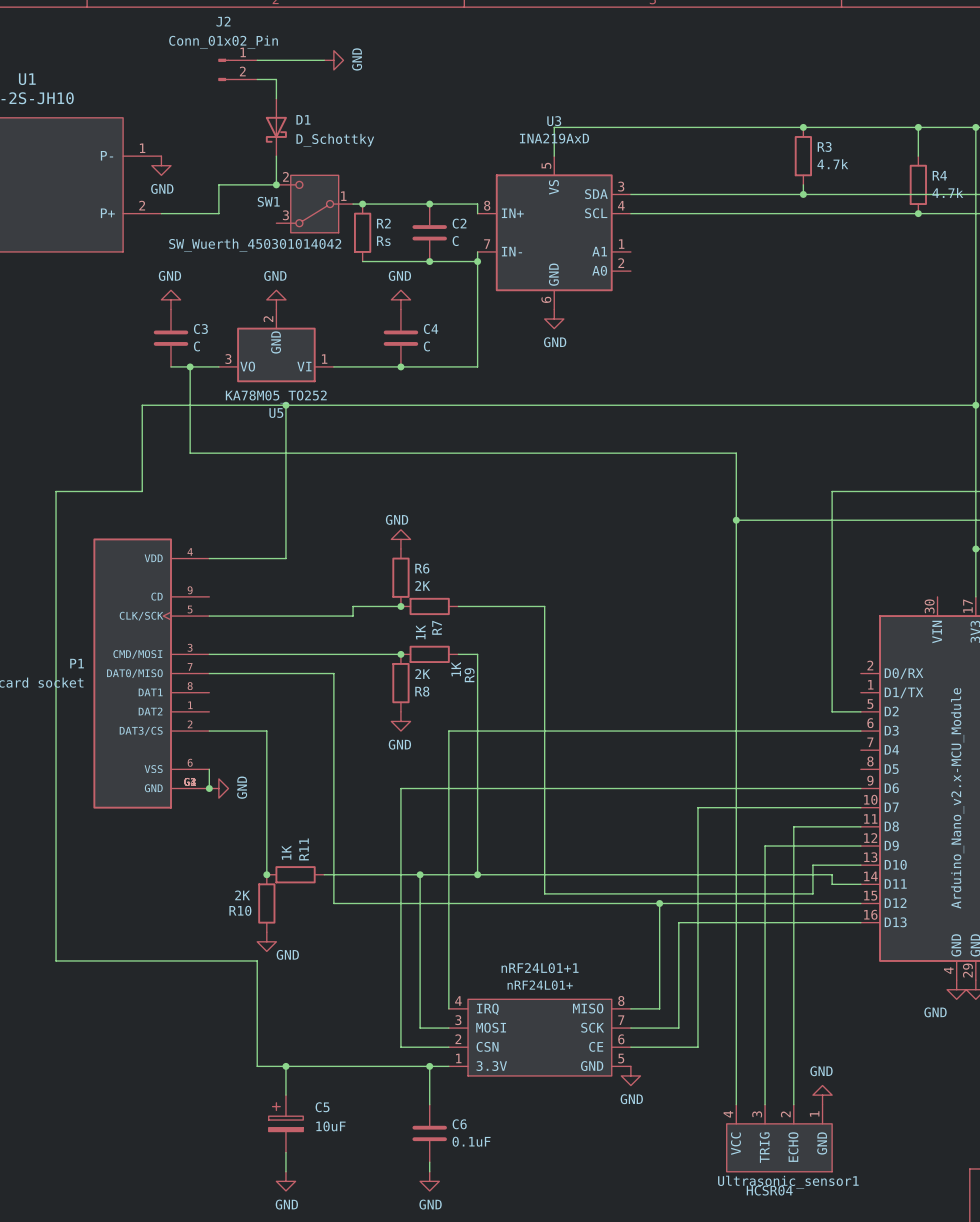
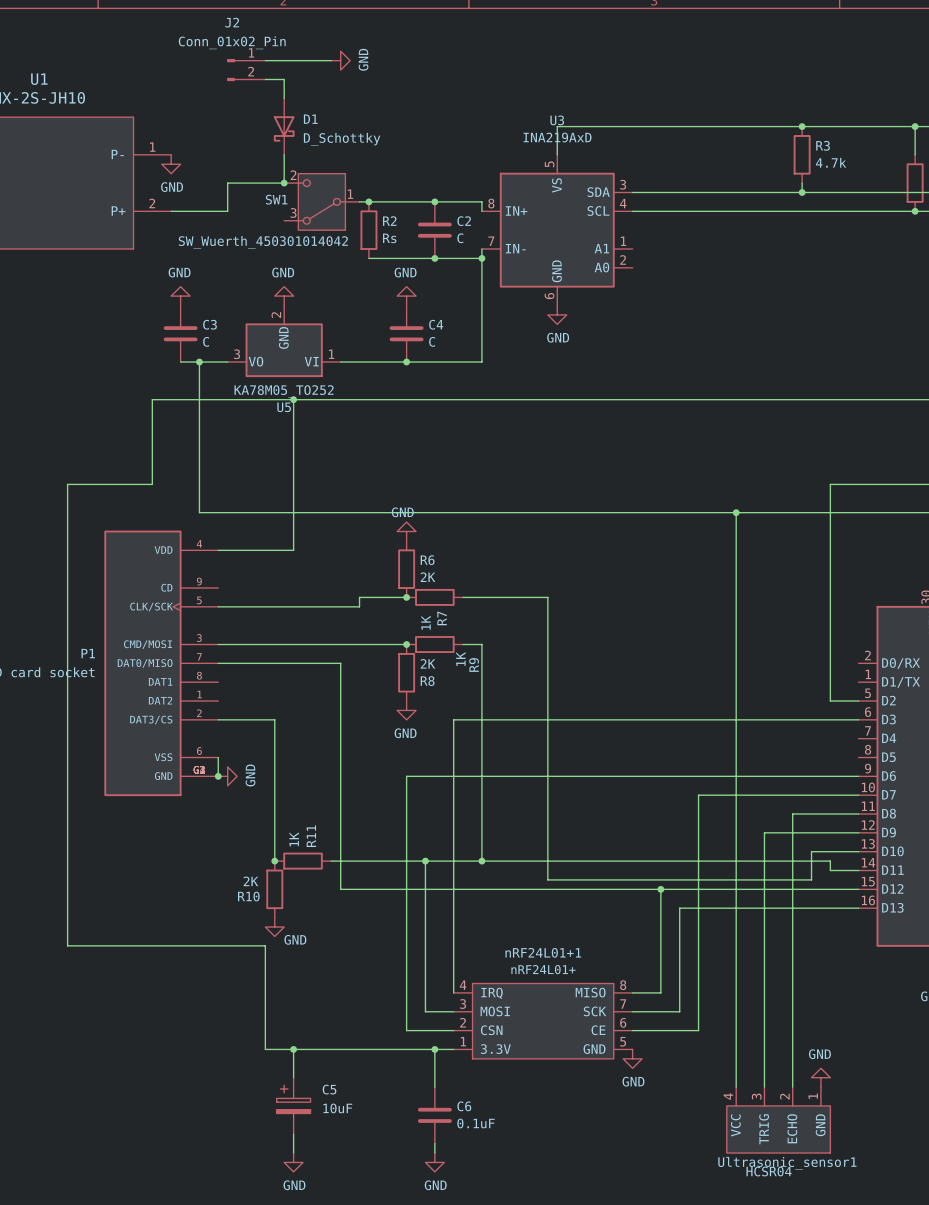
wire: (190, 453) (736, 453) (736, 520) -> (199, 446) (199, 512) (736, 512)

